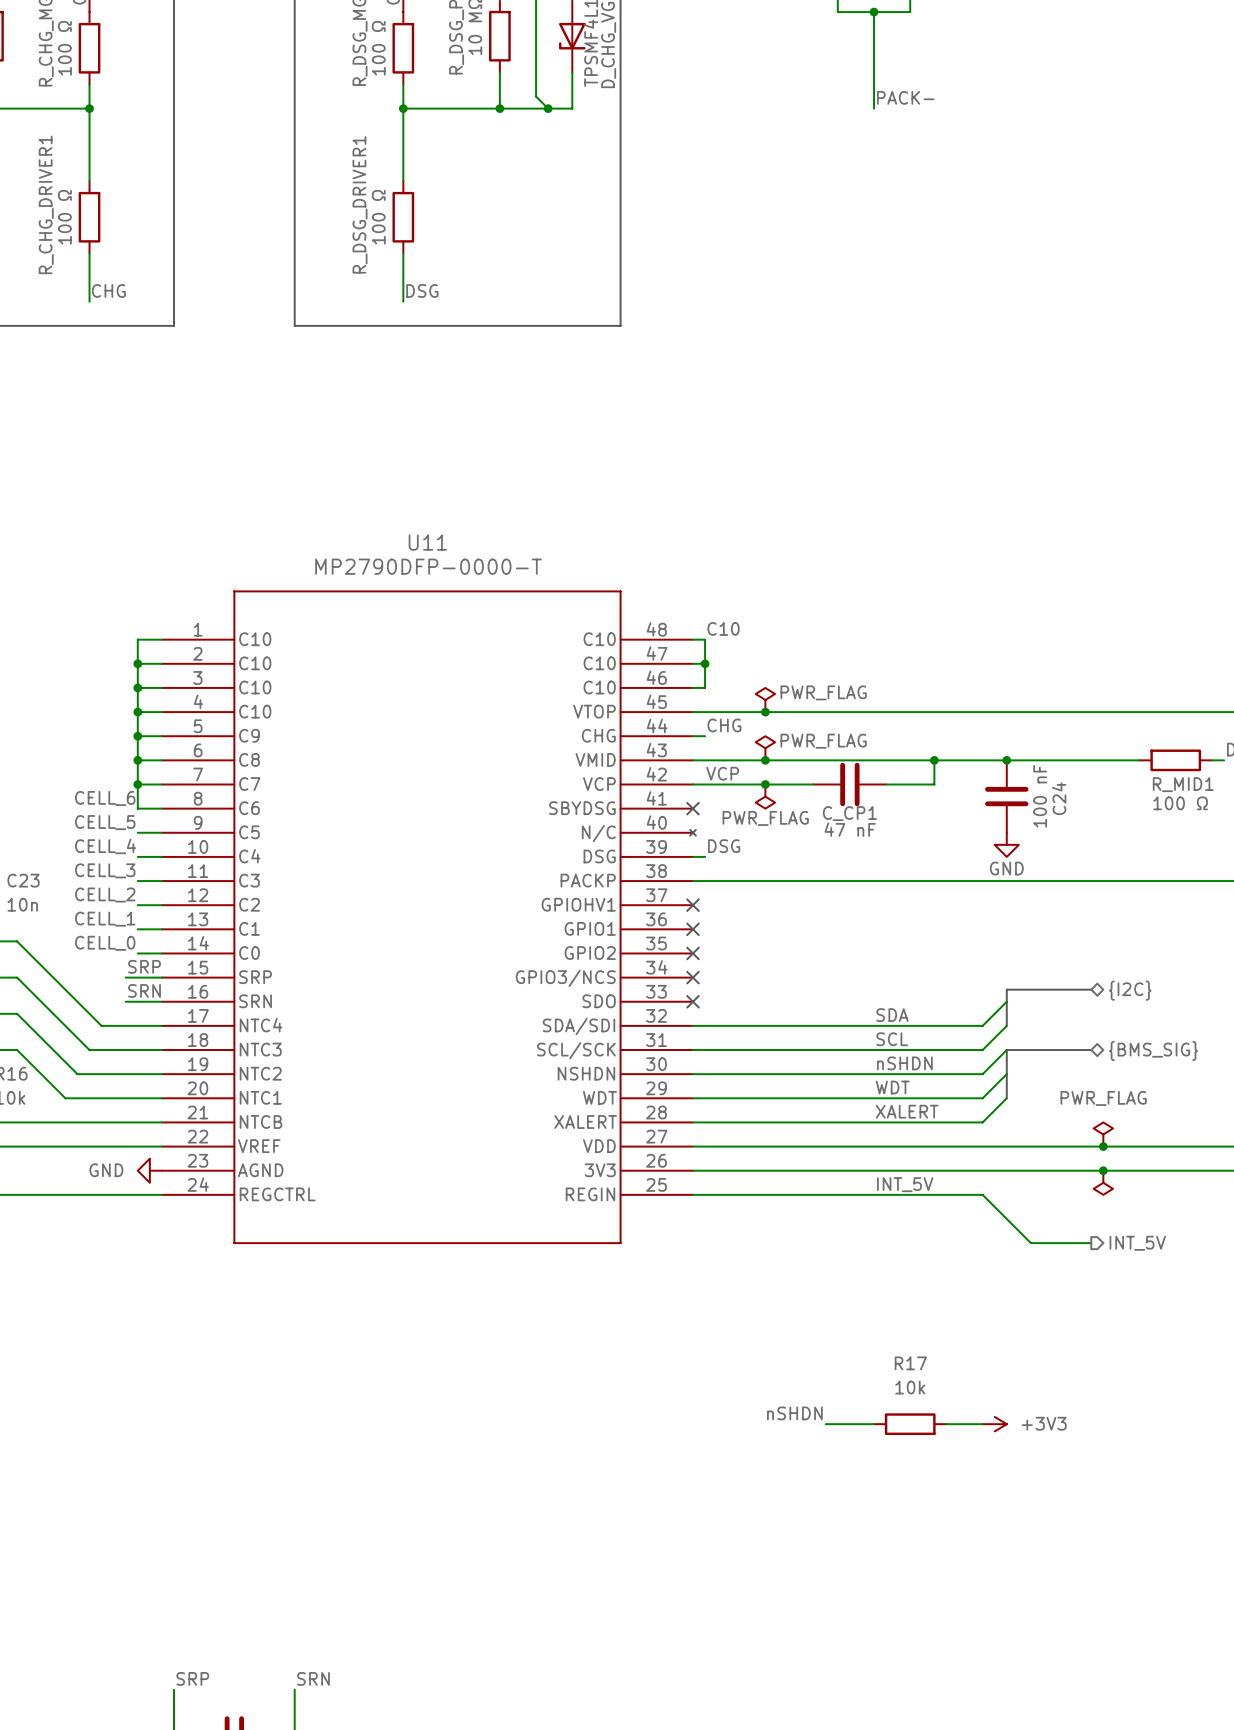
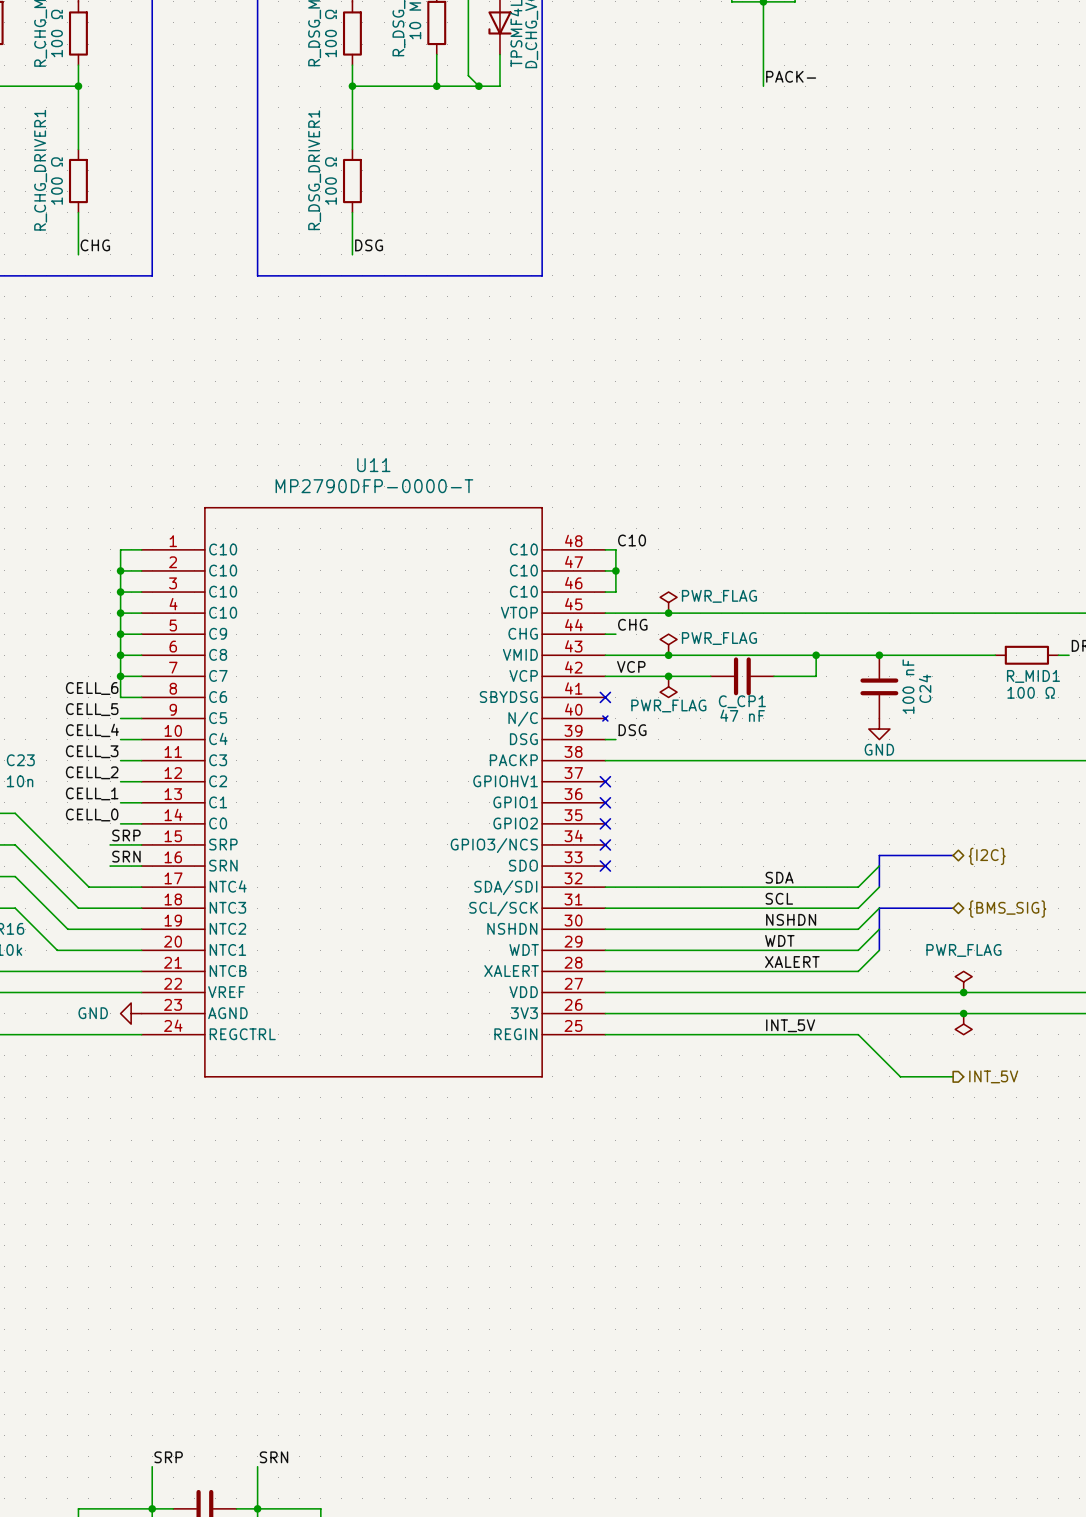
label: nSHDN (904, 1063) -> NSHDN (791, 919)
label: nSHDN (794, 1413) -> none
wire: (825, 1424) (874, 1424) -> none
R17: 10k (910, 1424) -> none
wire: (946, 1424) (982, 1424) -> none
power symbol: +3V3 (994, 1424) -> none

